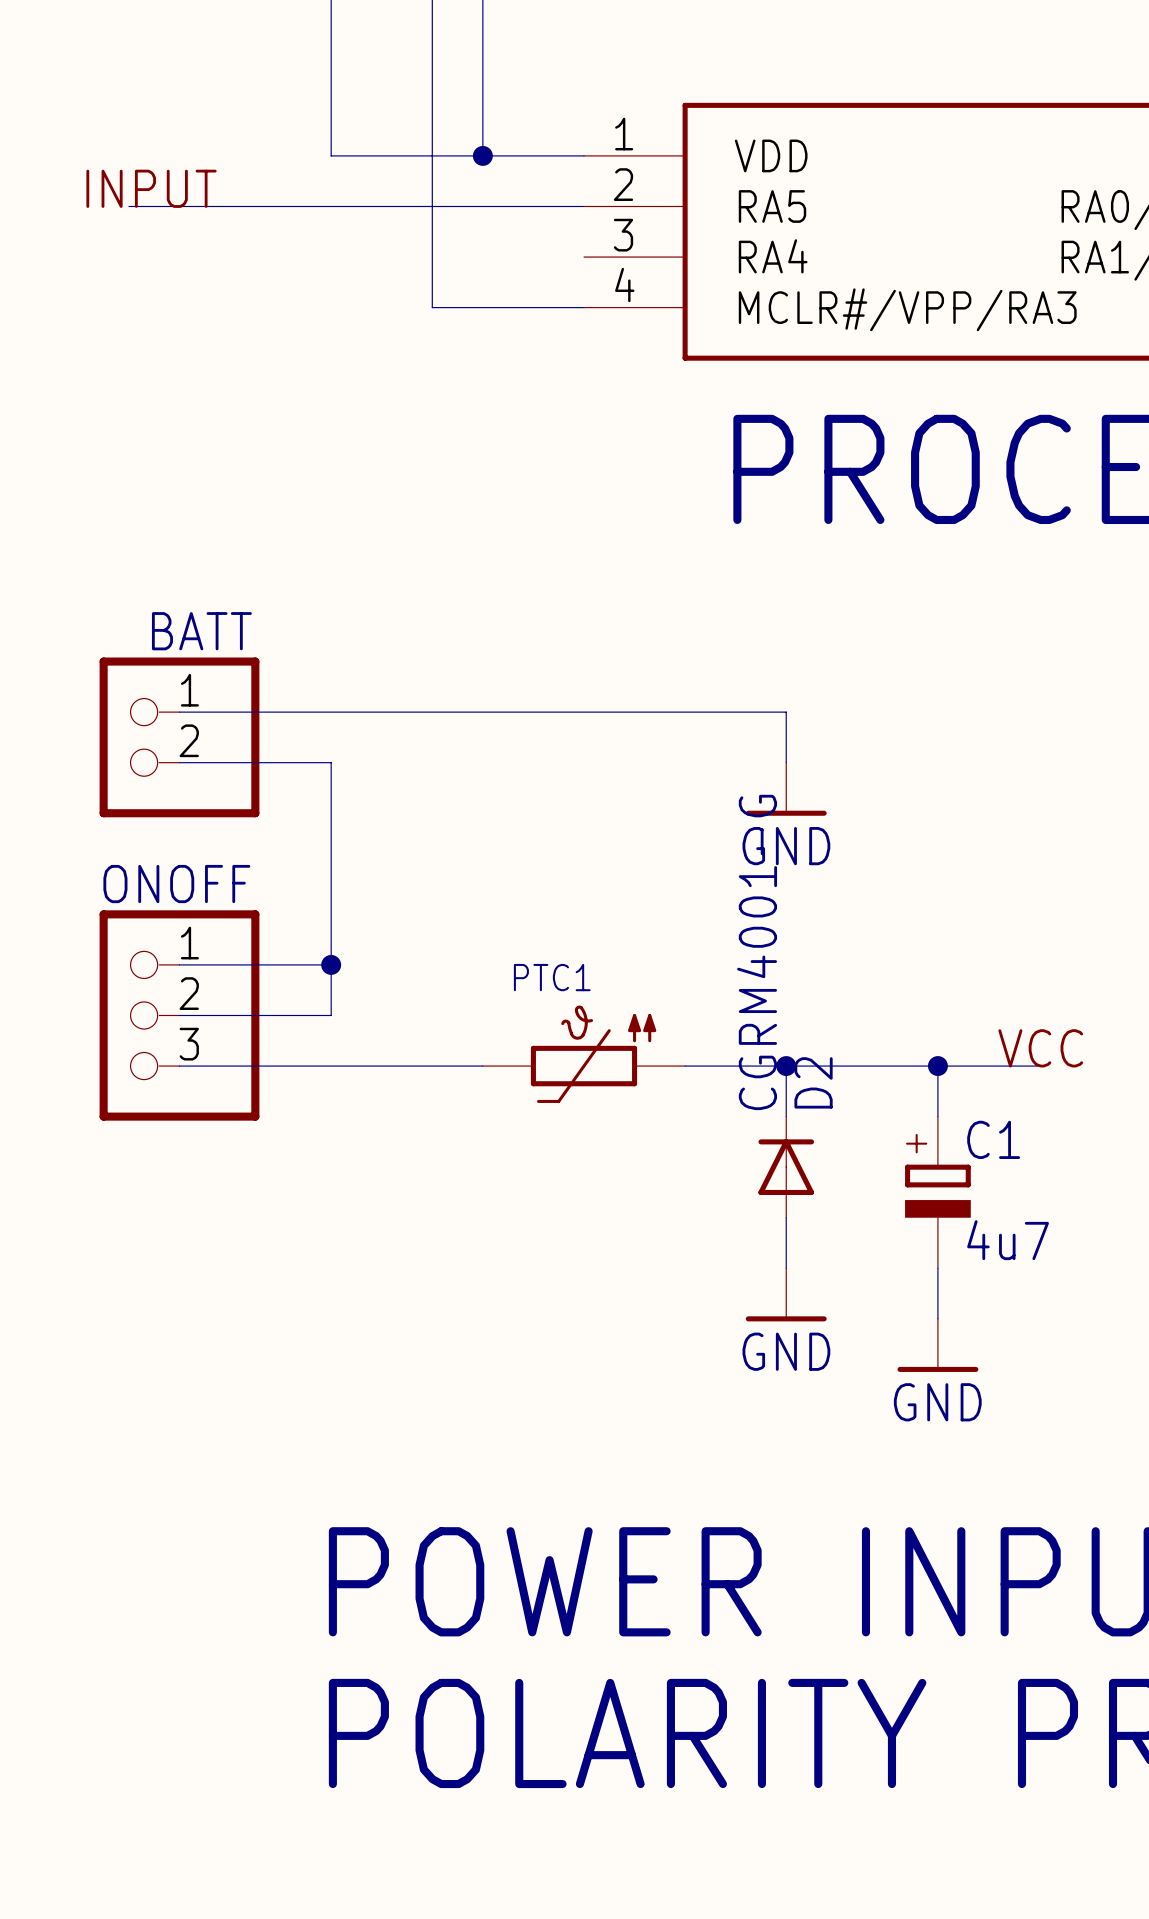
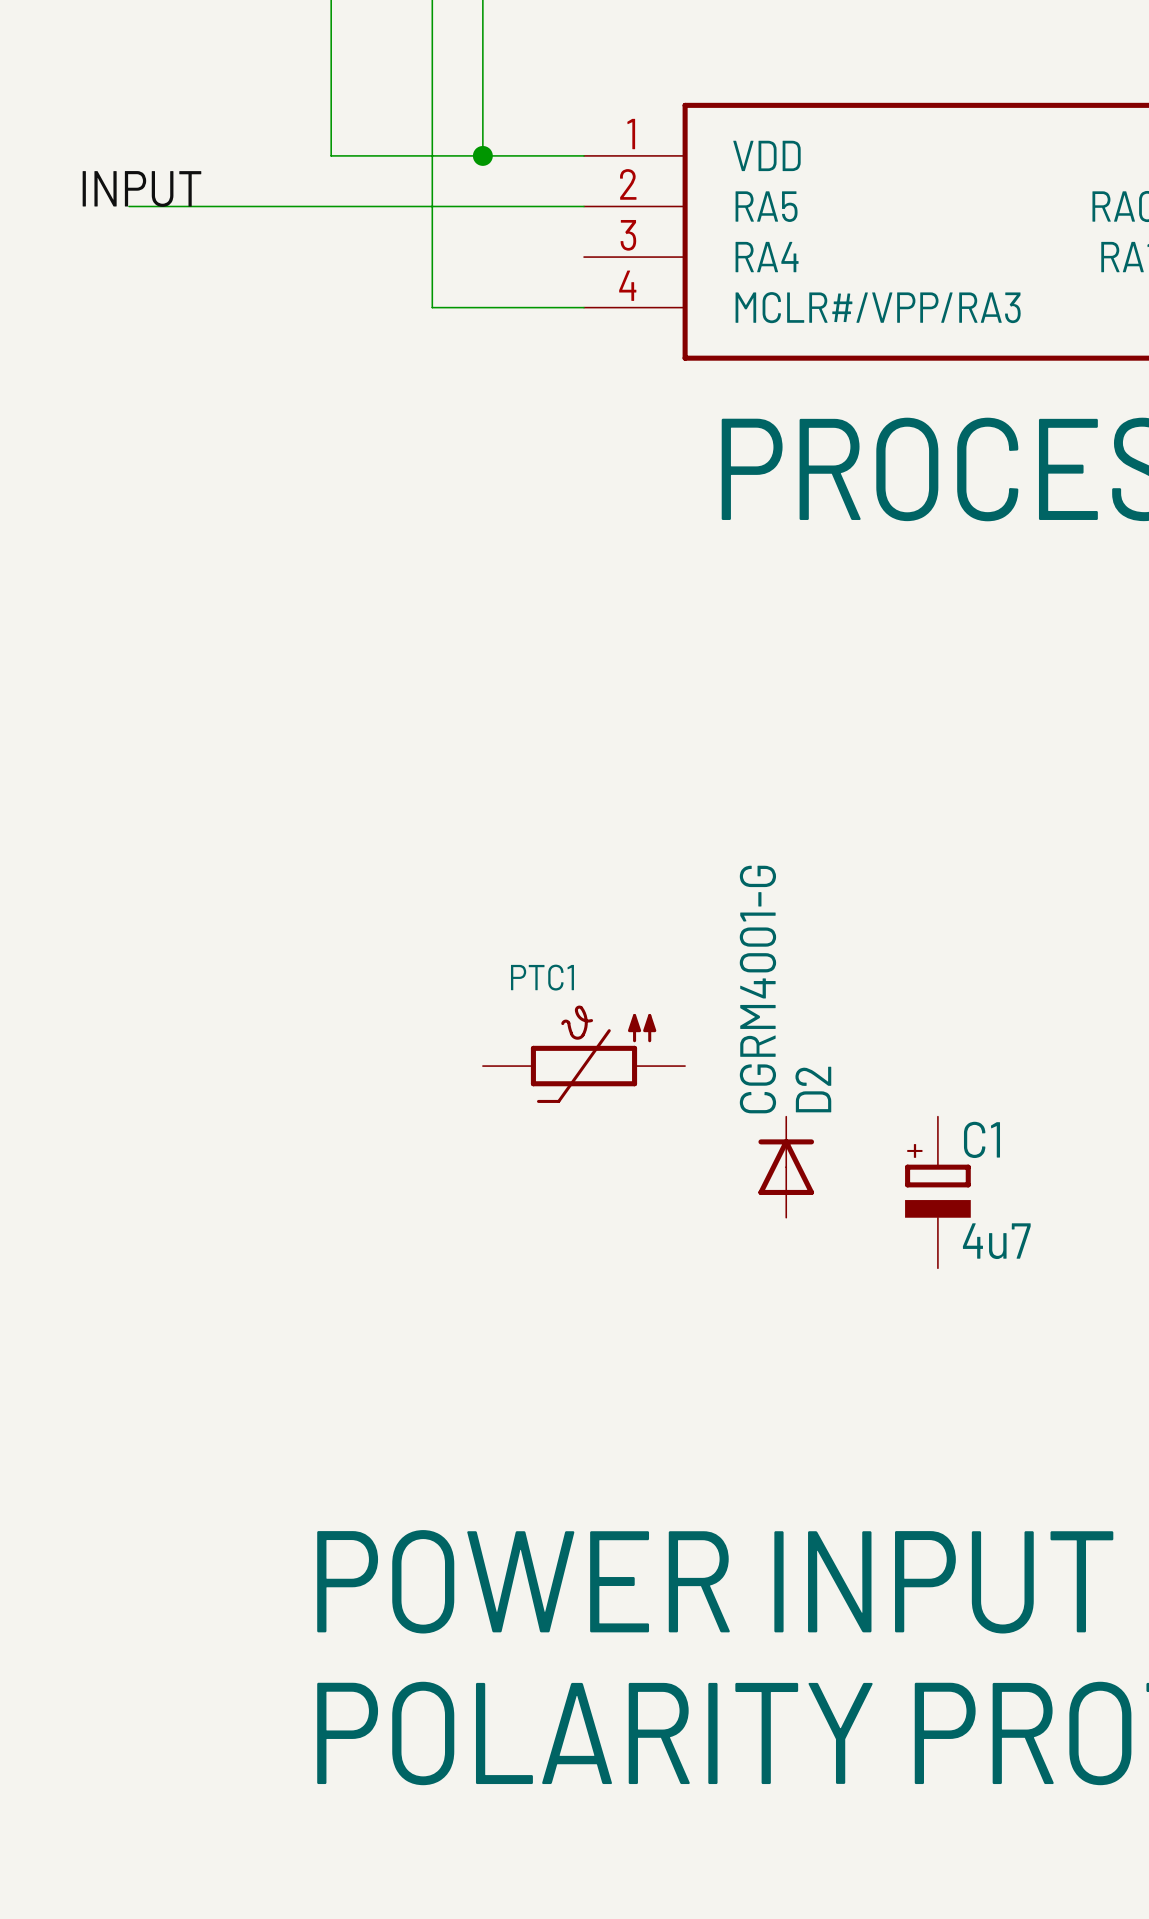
wire: (179, 712) (786, 712) (786, 762) -> none
BATT: (179, 737) -> none
wire: (179, 762) (331, 762) (331, 1015) (179, 1015) -> none
power symbol: GND (786, 789) -> none
wire: (179, 964) (331, 964) -> none
junction: (331, 964) -> none
ONOFF: (179, 1015) -> none
label: VCC (1040, 1048) -> none
wire: (179, 1066) (482, 1066) -> none
wire: (685, 1066) (1039, 1066) -> none
wire: (786, 1066) (786, 1116) -> none
junction: (786, 1066) -> none
wire: (937, 1066) (937, 1116) -> none
junction: (937, 1066) -> none
wire: (786, 1217) (786, 1268) -> none
wire: (937, 1268) (937, 1318) -> none
power symbol: GND (786, 1294) -> none
power symbol: GND (937, 1345) -> none

